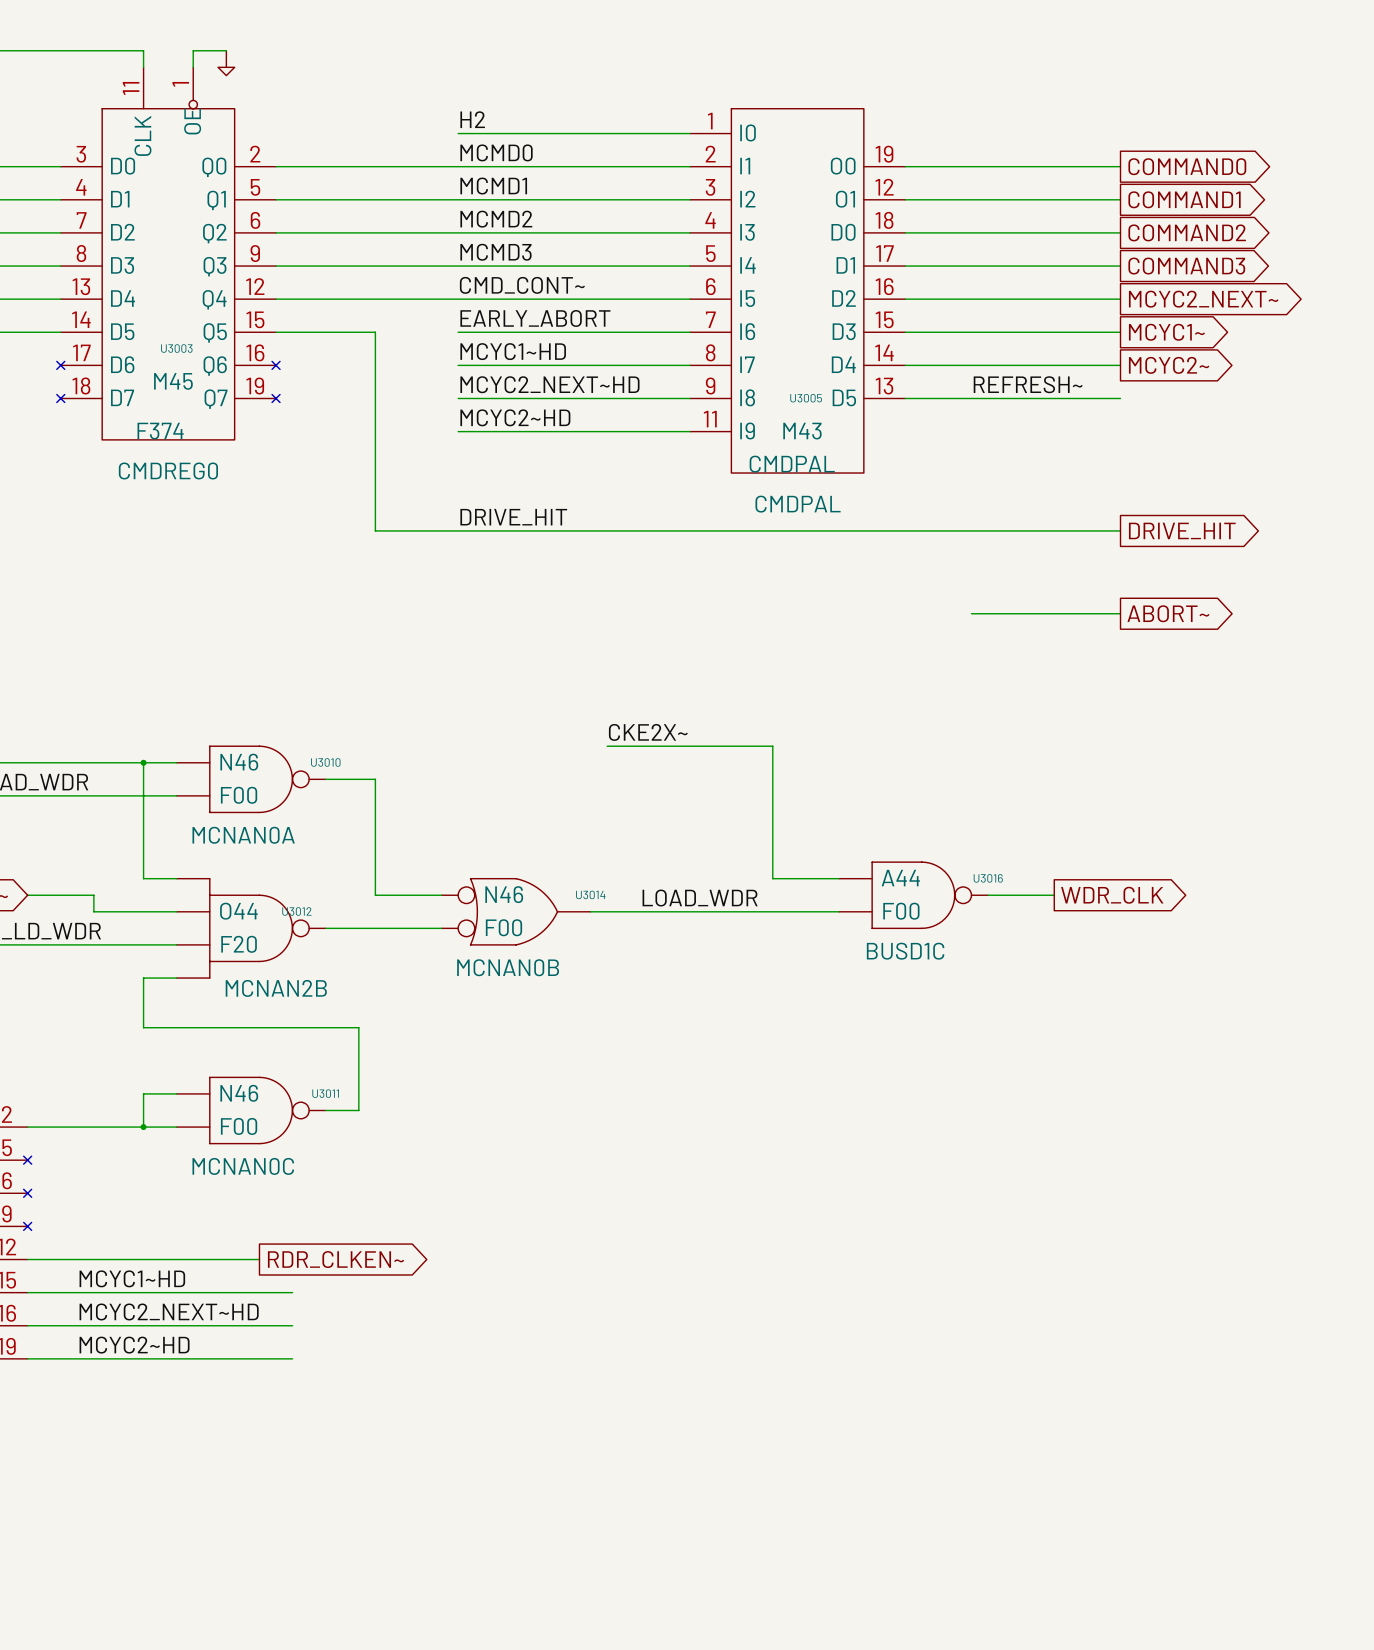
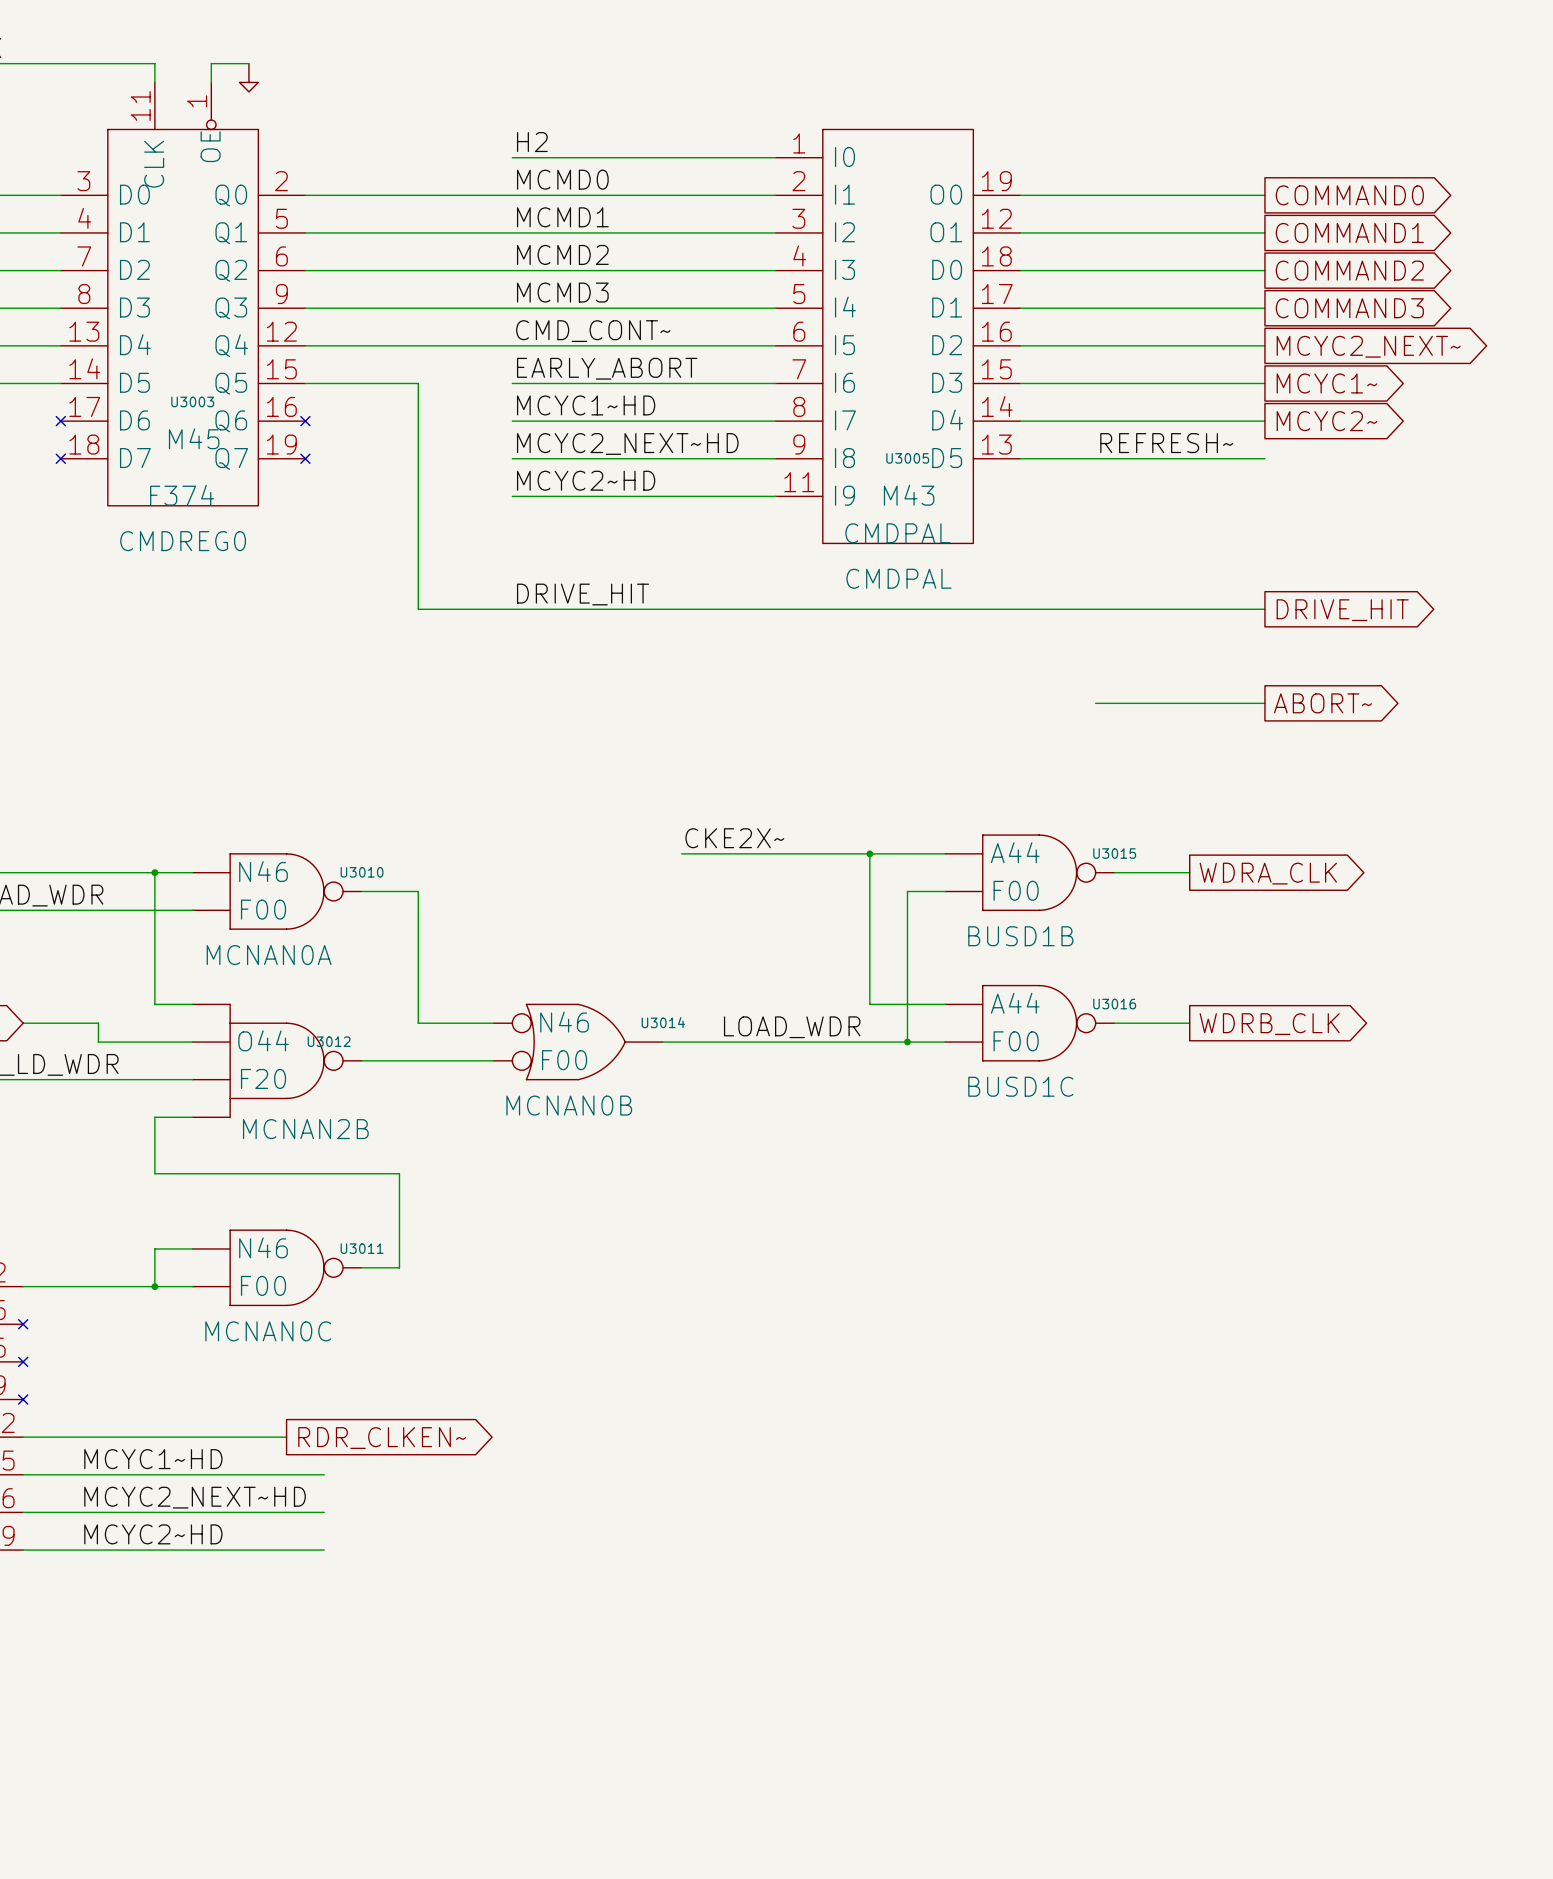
wire: none -> (869, 853) (945, 853)
junction: none -> (869, 853)
U3015: none -> F00 (1029, 872)
wire: none -> (1114, 872) (1189, 872)
global label: none -> WDRA_CLK (1268, 873)
wire: none -> (945, 891) (907, 891) (907, 1042)
global label: WDR_CLK (1112, 895) -> WDRB_CLK (1269, 1024)
junction: none -> (907, 1042)

